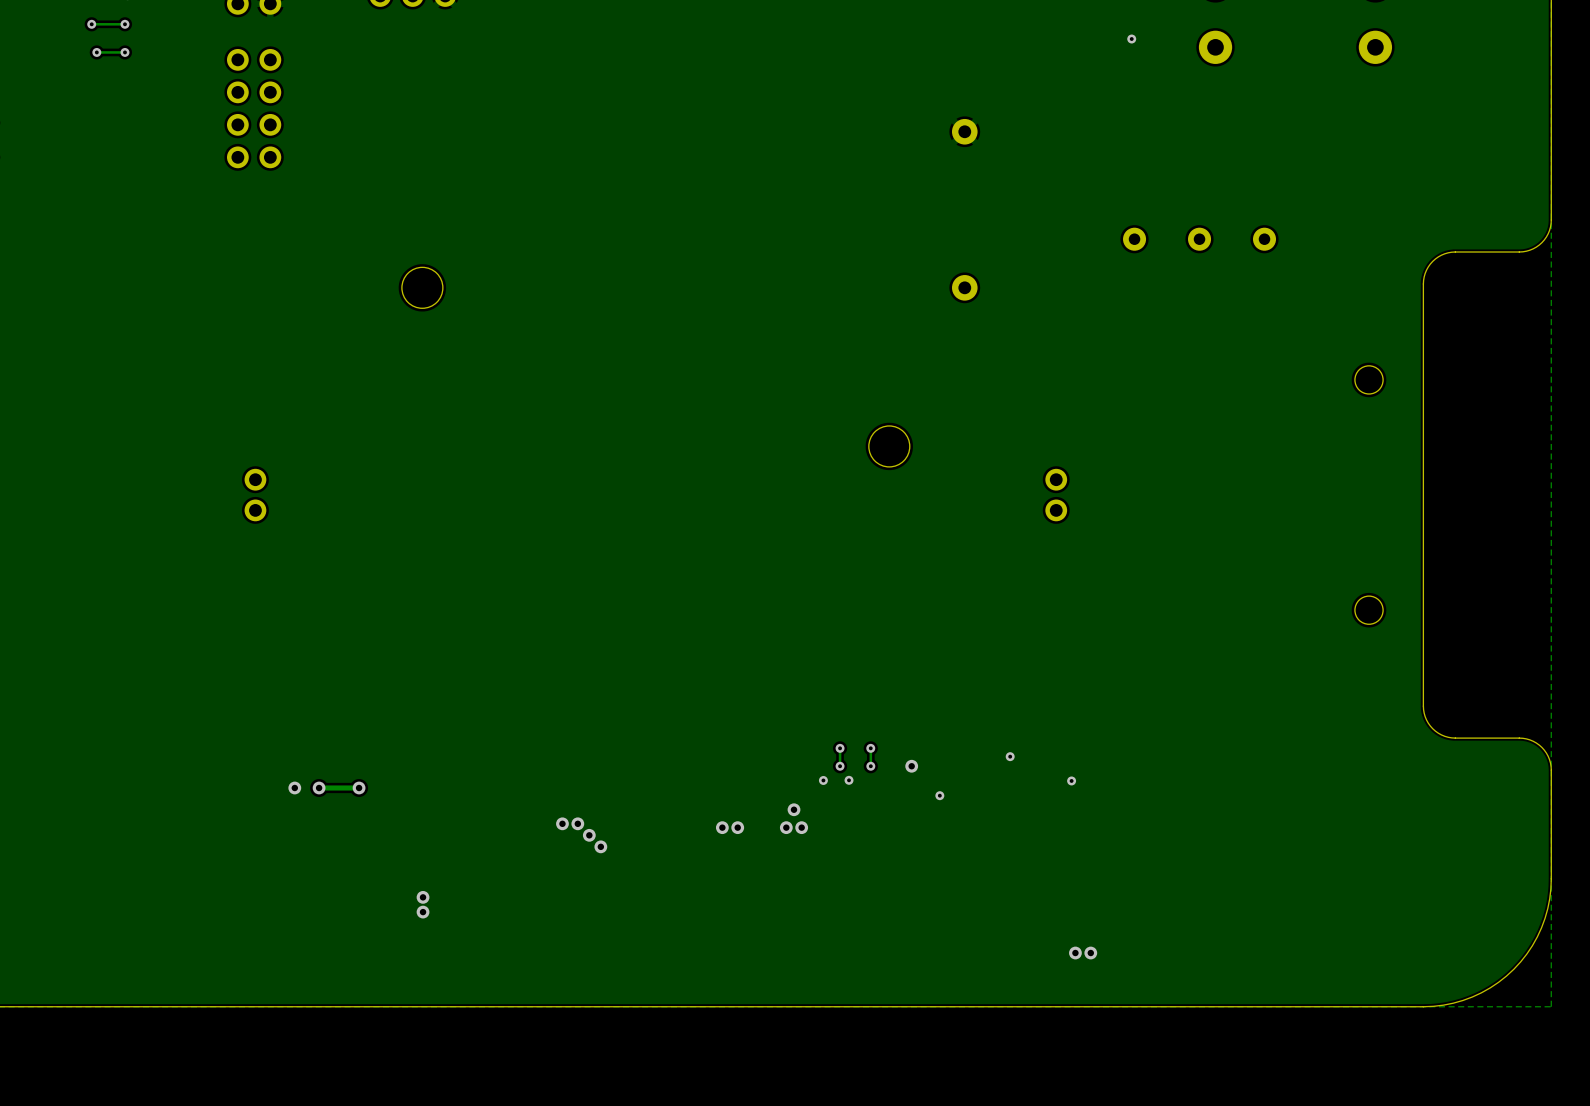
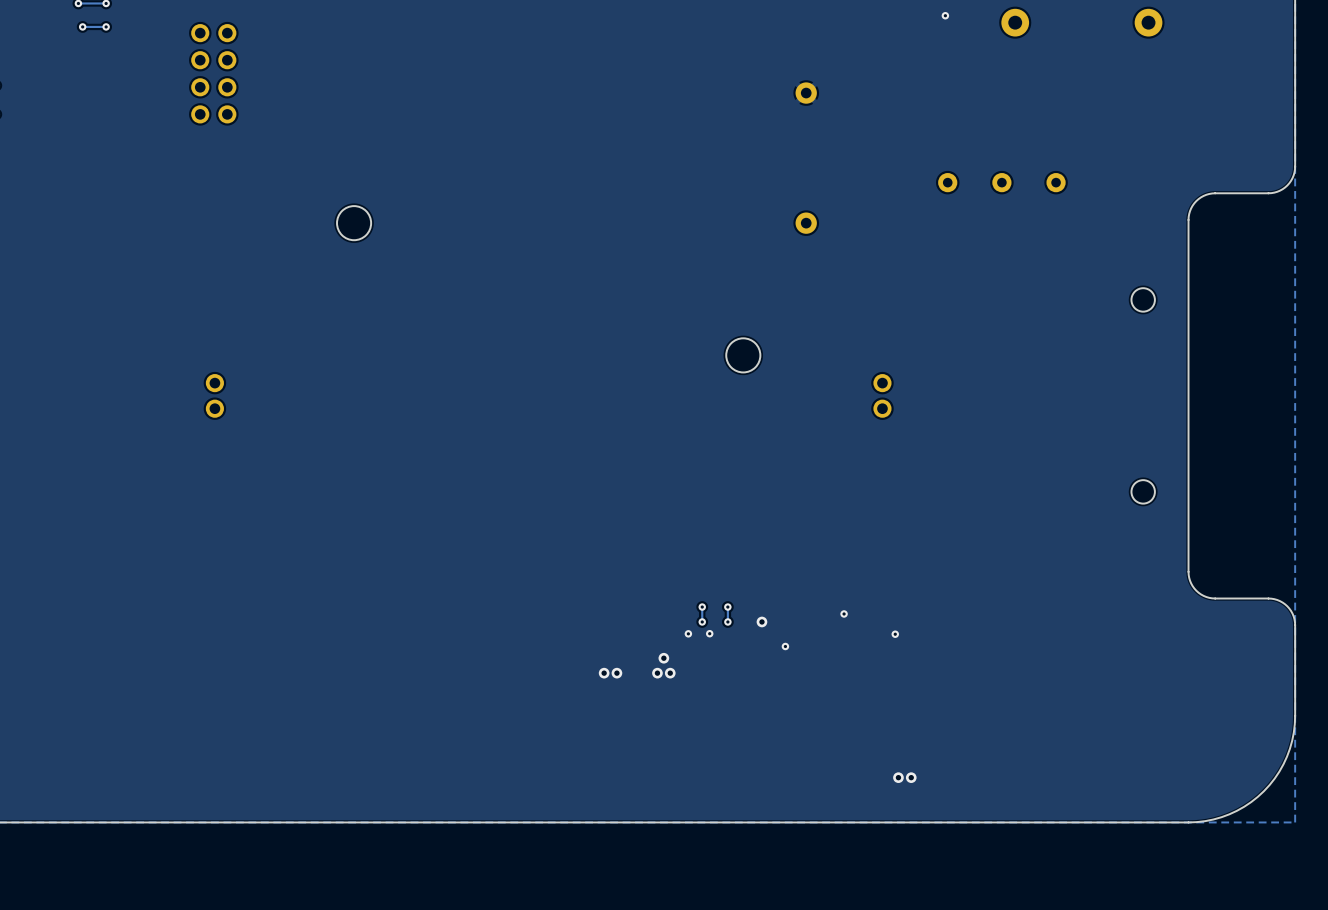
via: (294, 787) -> none
via: (319, 787) -> none
track: (359, 787) (319, 787) -> none
via: (359, 787) -> none
via: (562, 823) -> none
via: (577, 823) -> none
via: (589, 835) -> none
via: (600, 846) -> none
via: (423, 897) -> none
via: (423, 912) -> none

